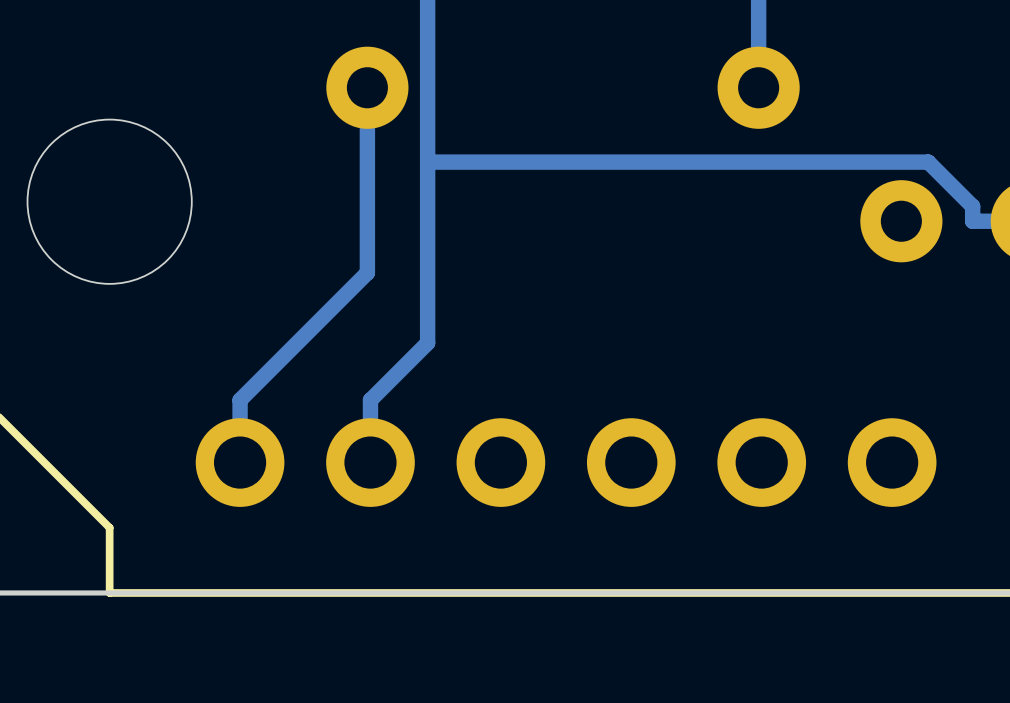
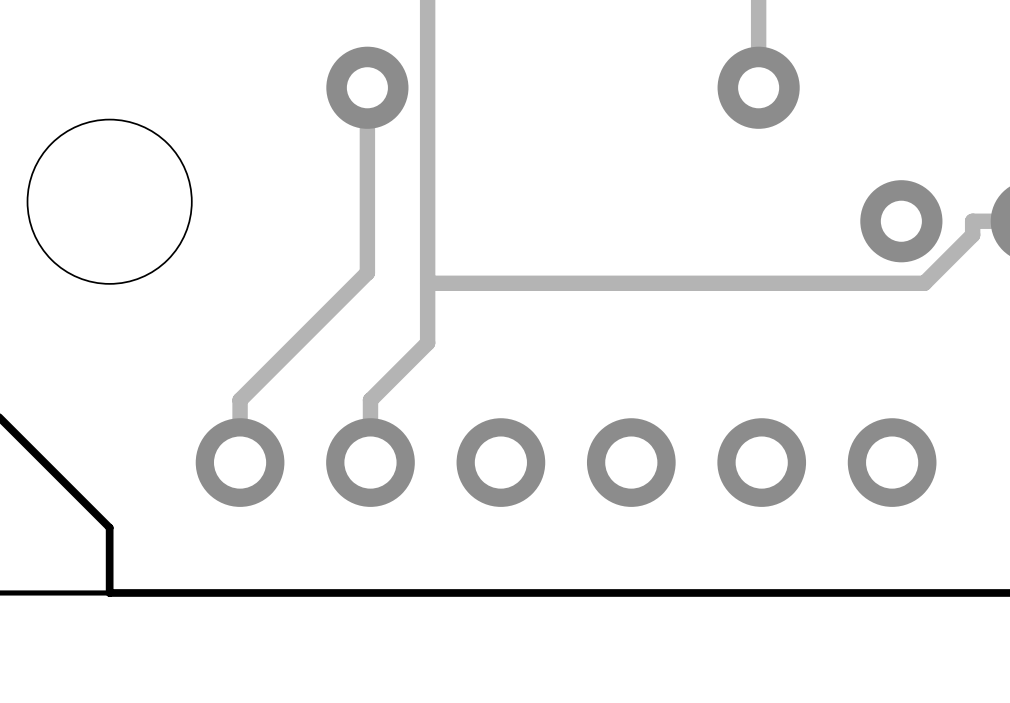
track: (427, 162) (928, 162) (972, 206) (972, 221) -> (427, 283) (924, 283) (972, 235) (972, 221)

